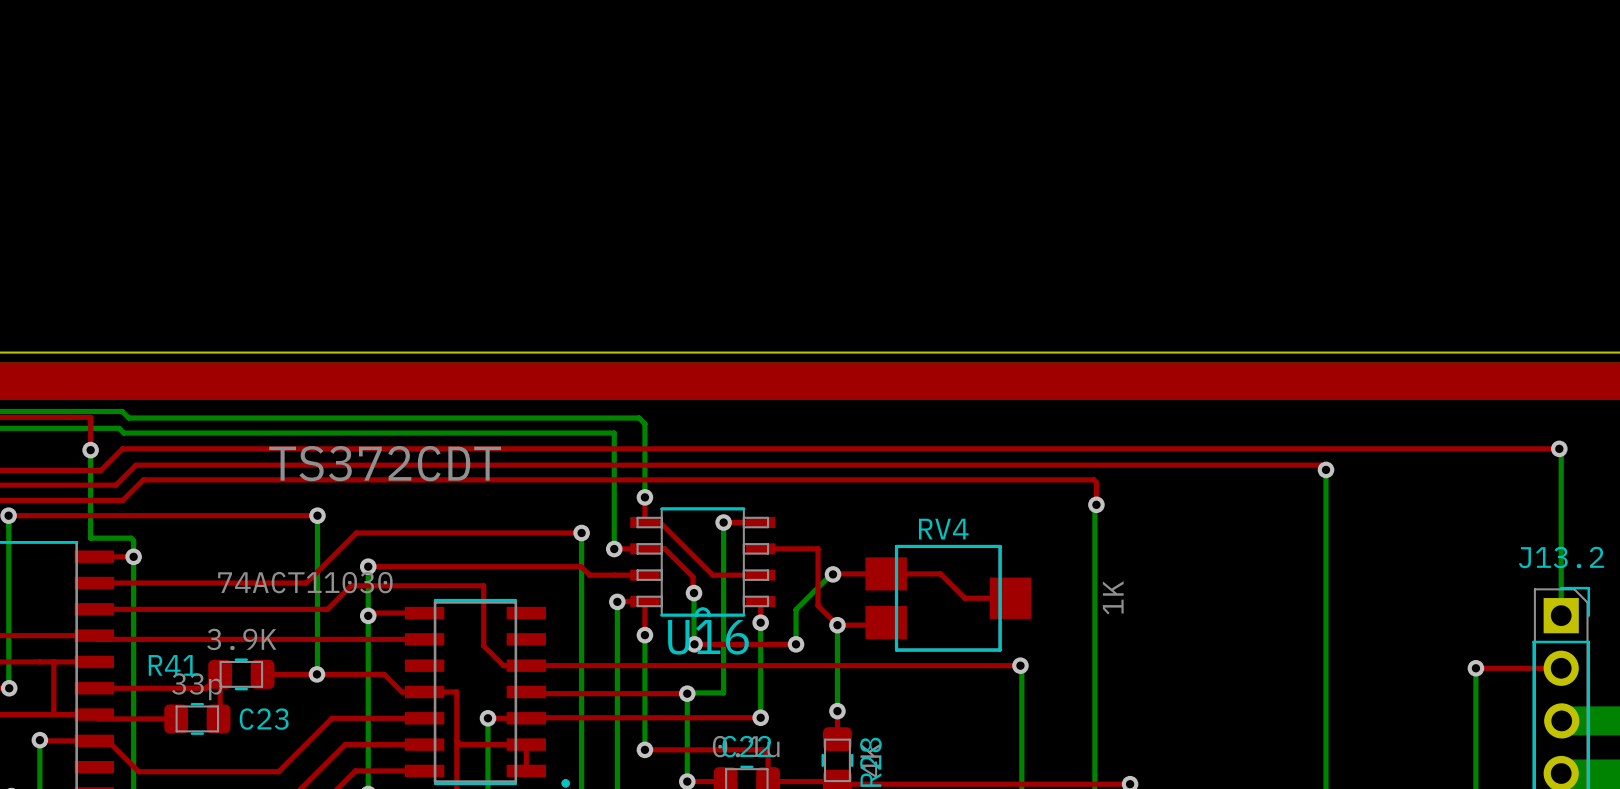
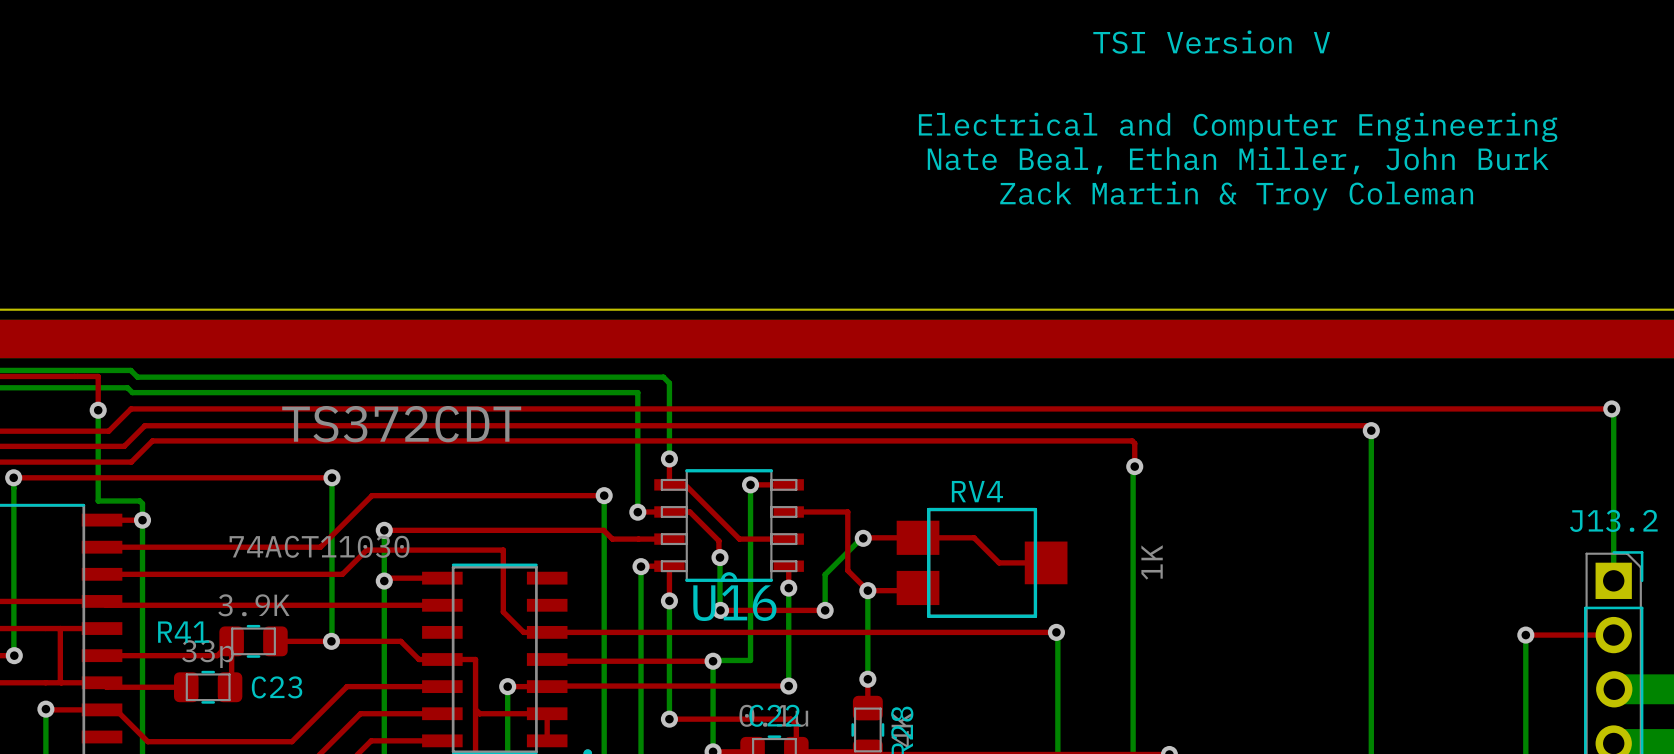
text: none -> TSI Version V (1211, 42)
text: none -> Electrical and Computer Engineering (1238, 127)
text: none -> Nate Beal, Ethan Miller, John Burk (1238, 160)
text: none -> Zack Martin & Troy Coleman (1236, 195)

